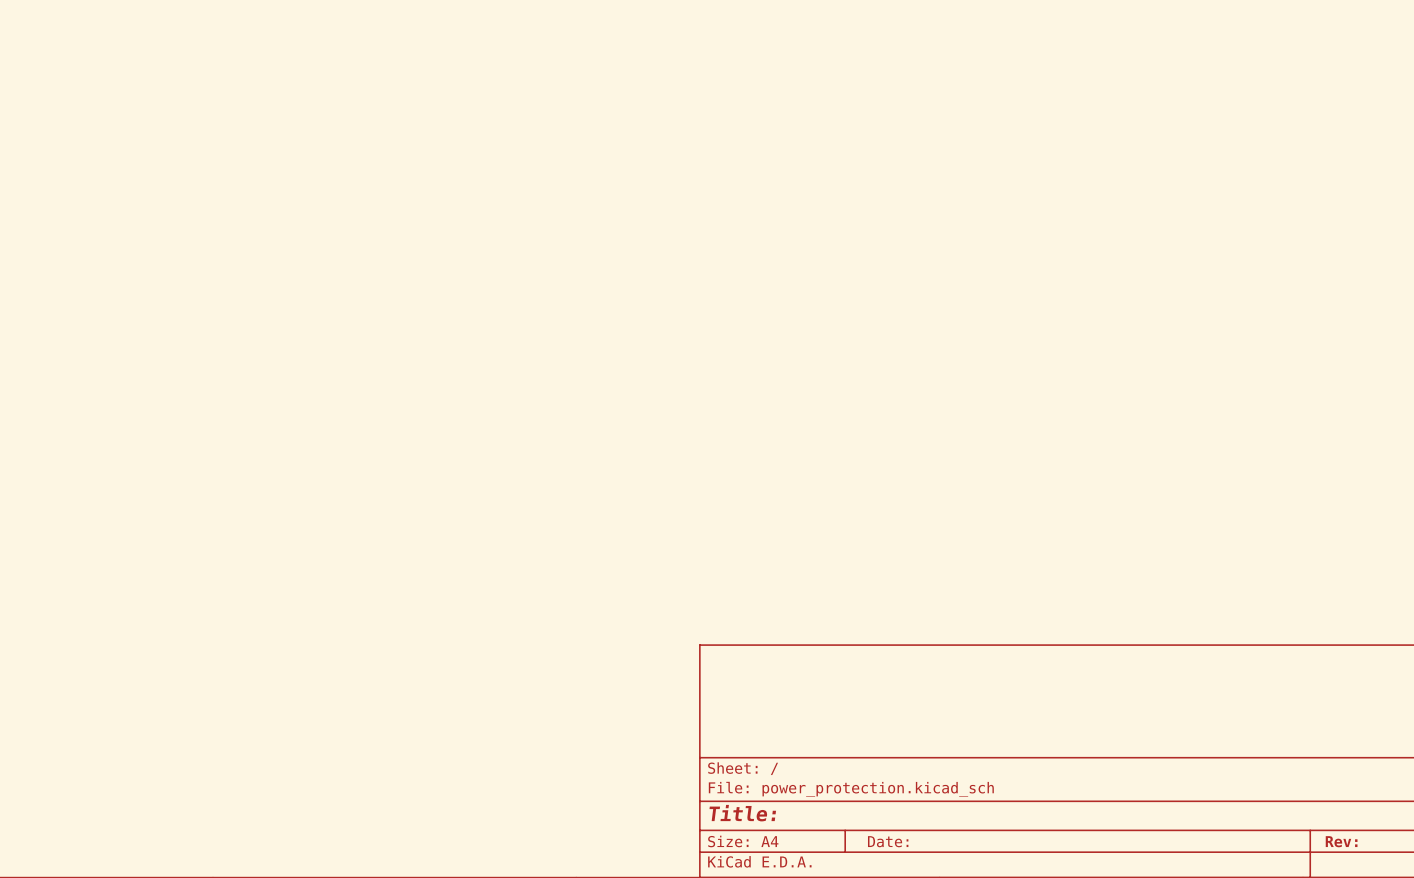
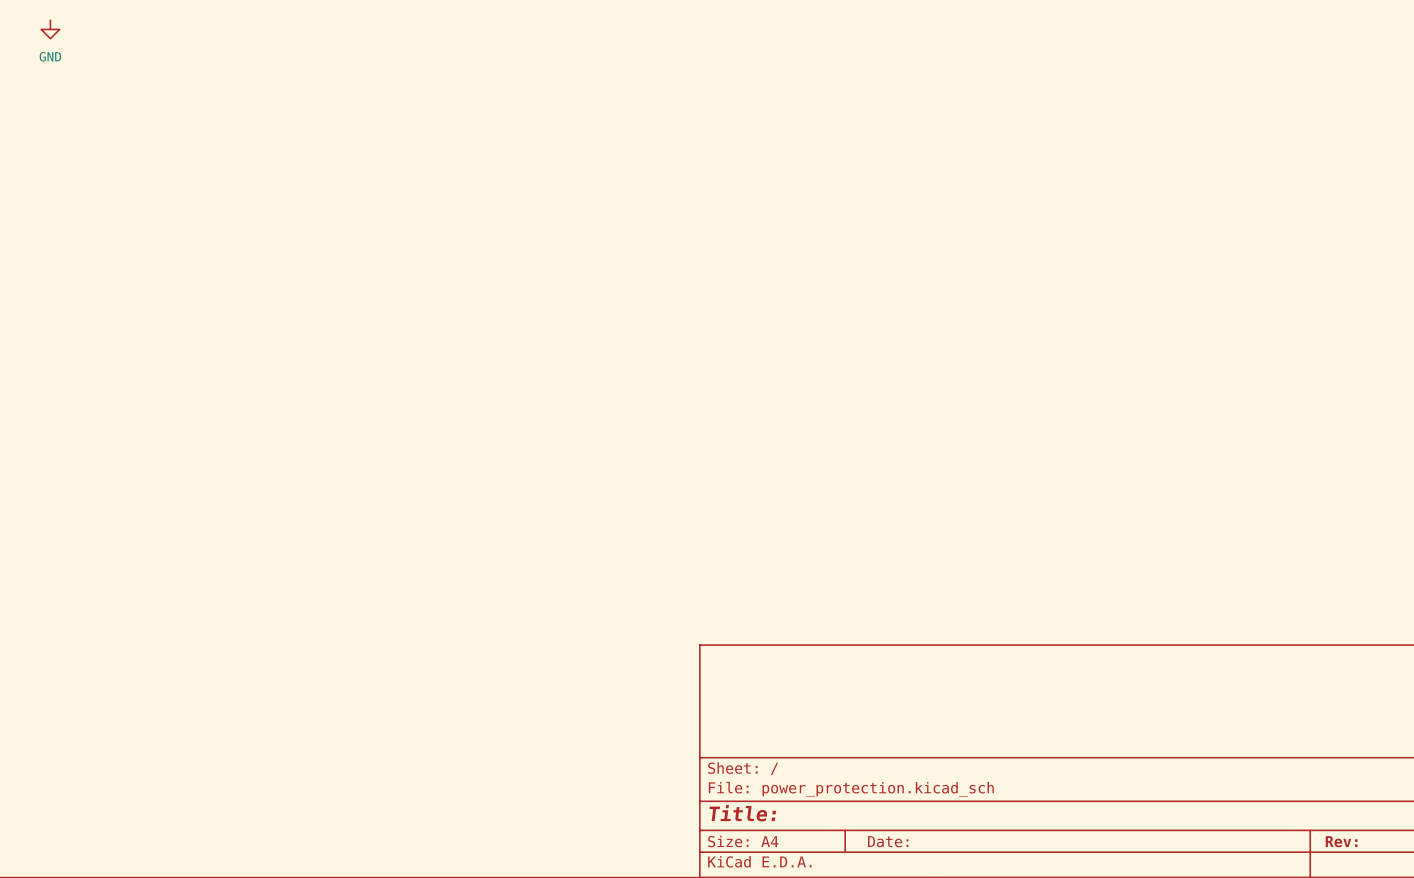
power symbol: none -> GND (50, 29)

